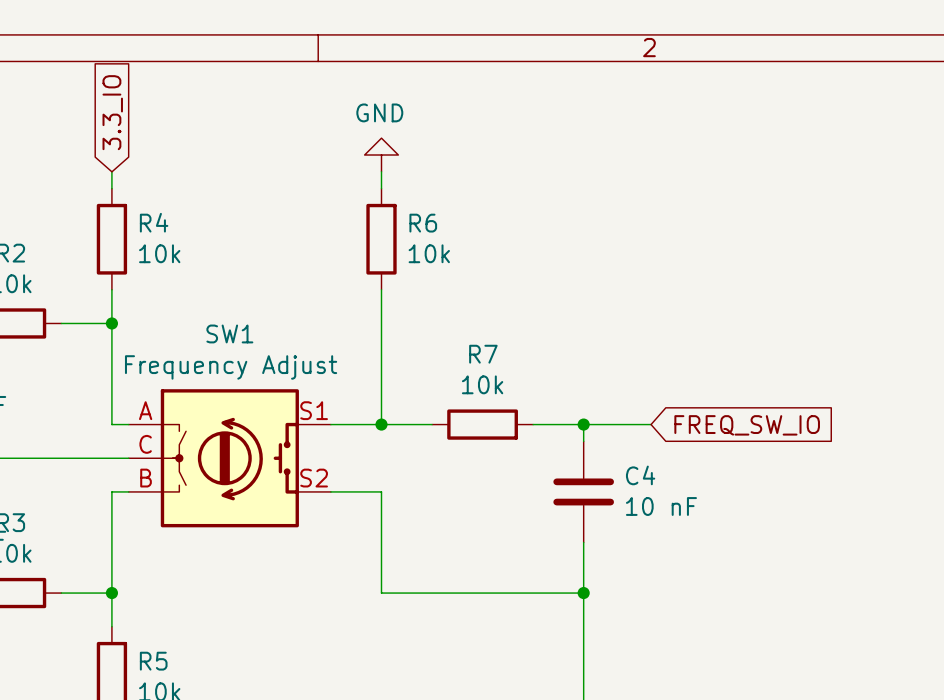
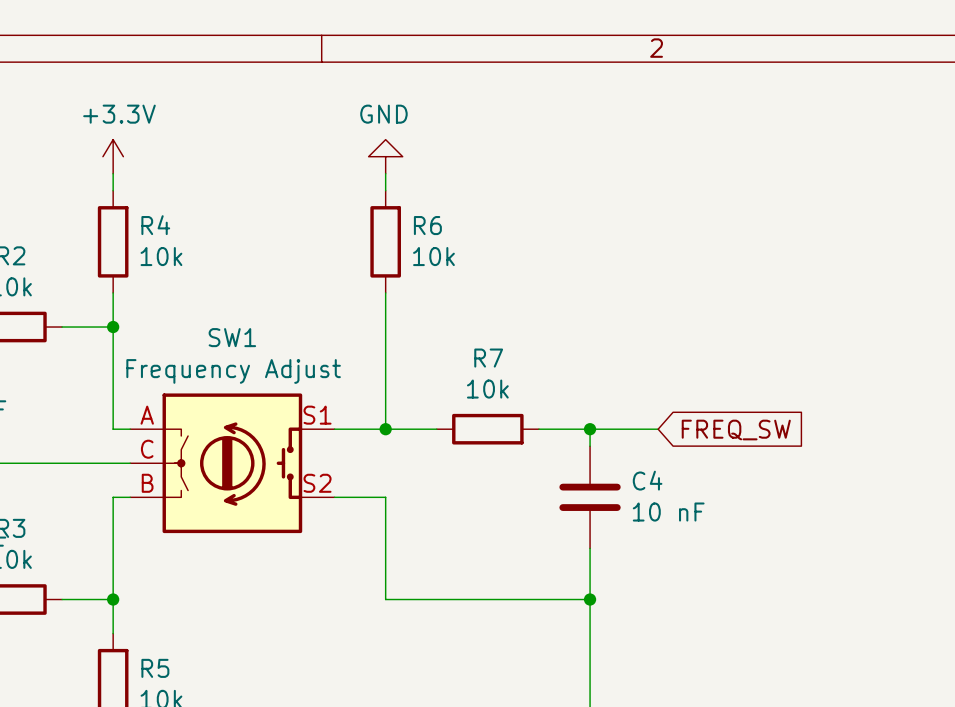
global label: 3.3_IO (112, 112) -> none
power symbol: none -> +3.3V (113, 156)
global label: FREQ_SW_IO (747, 425) -> FREQ_SW (736, 430)

